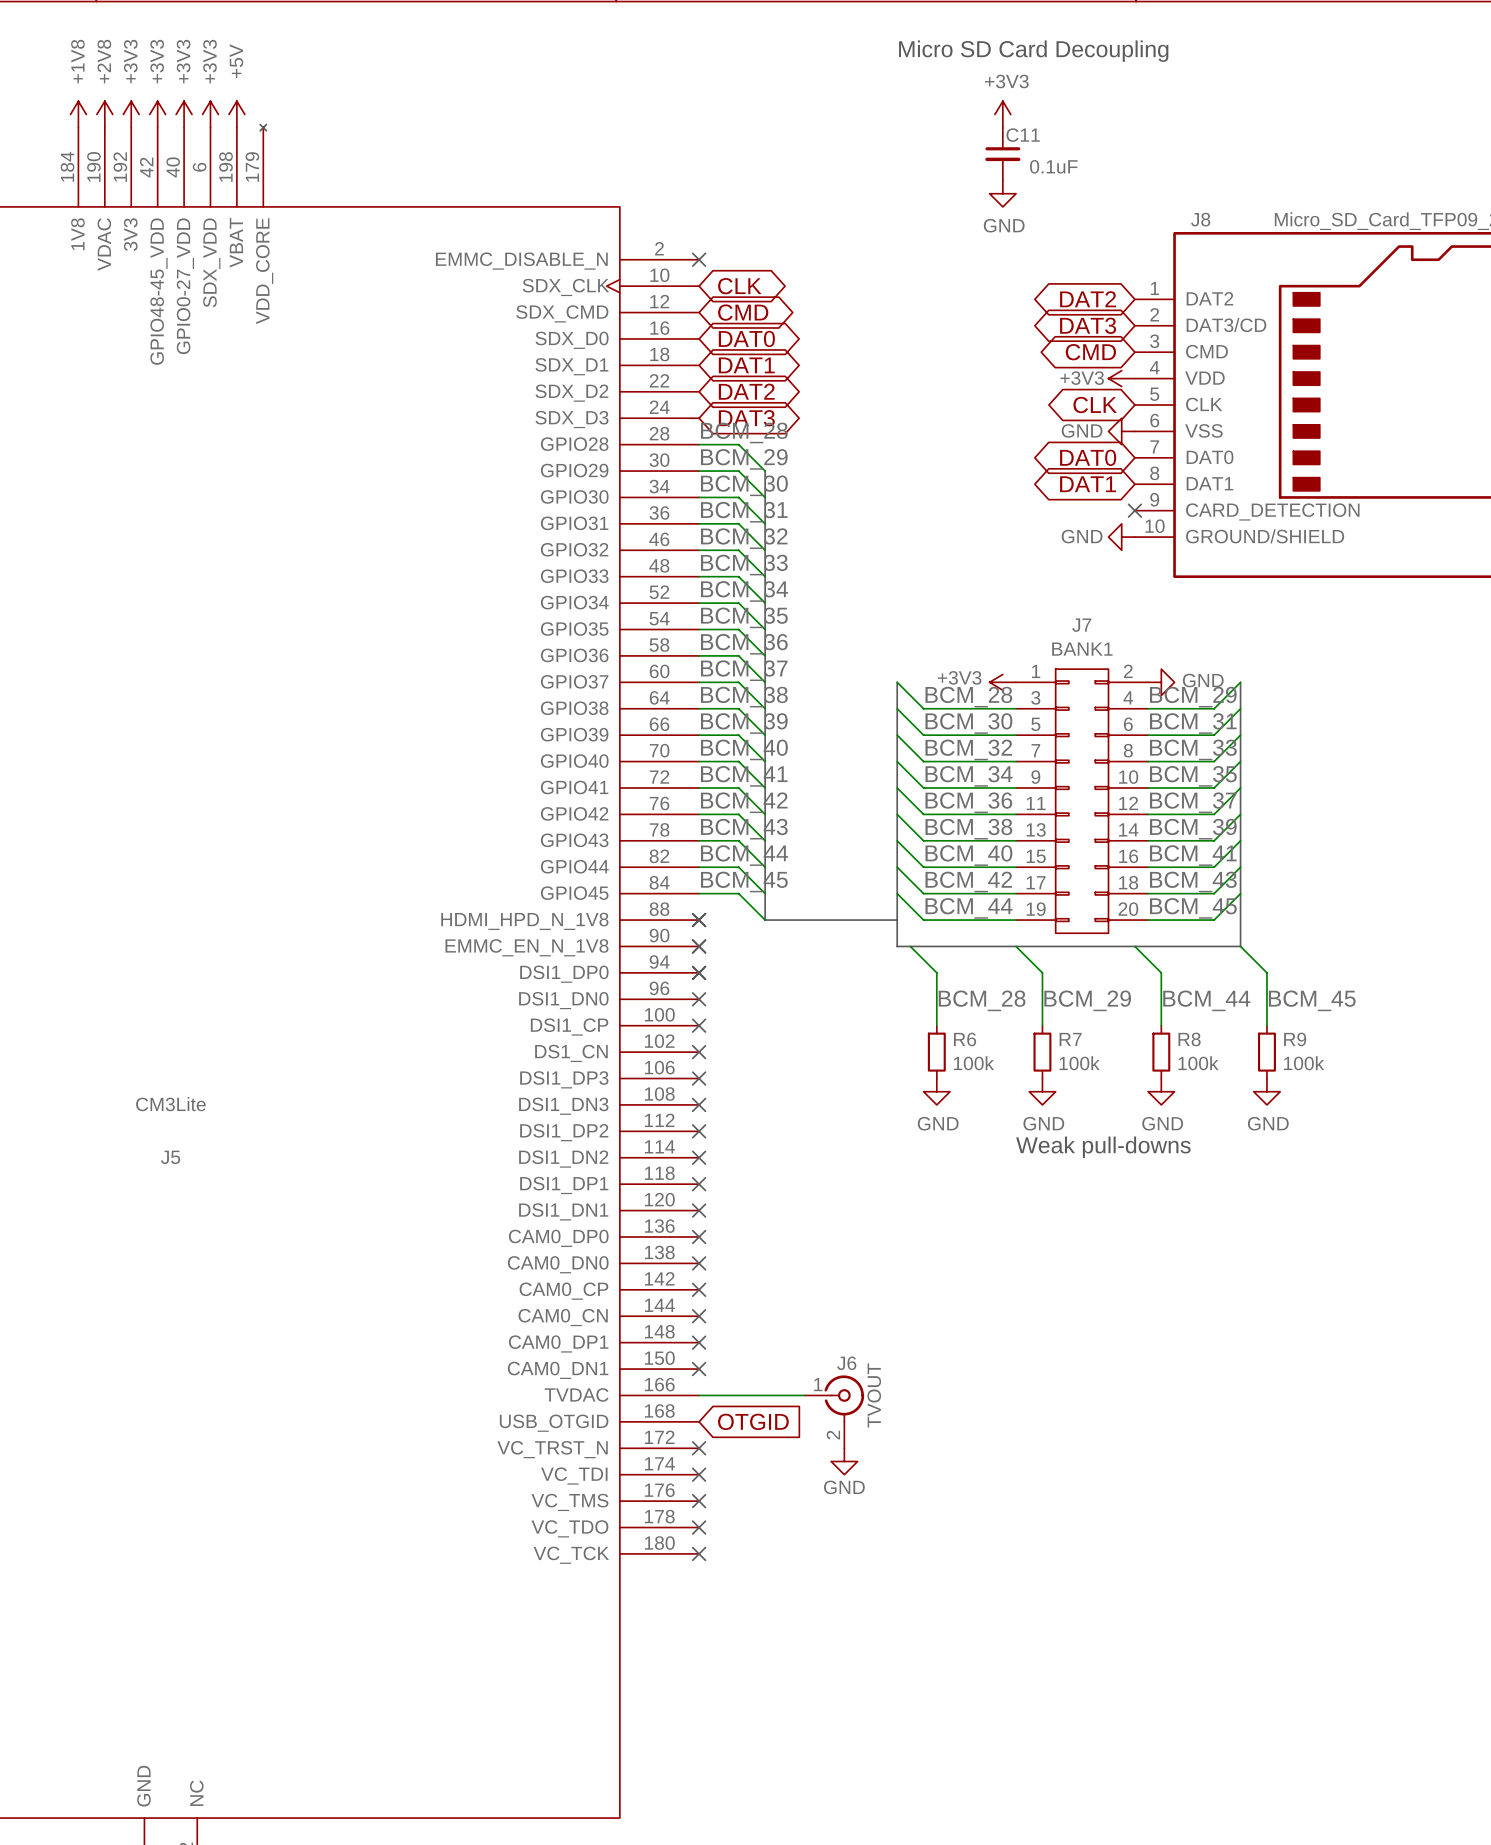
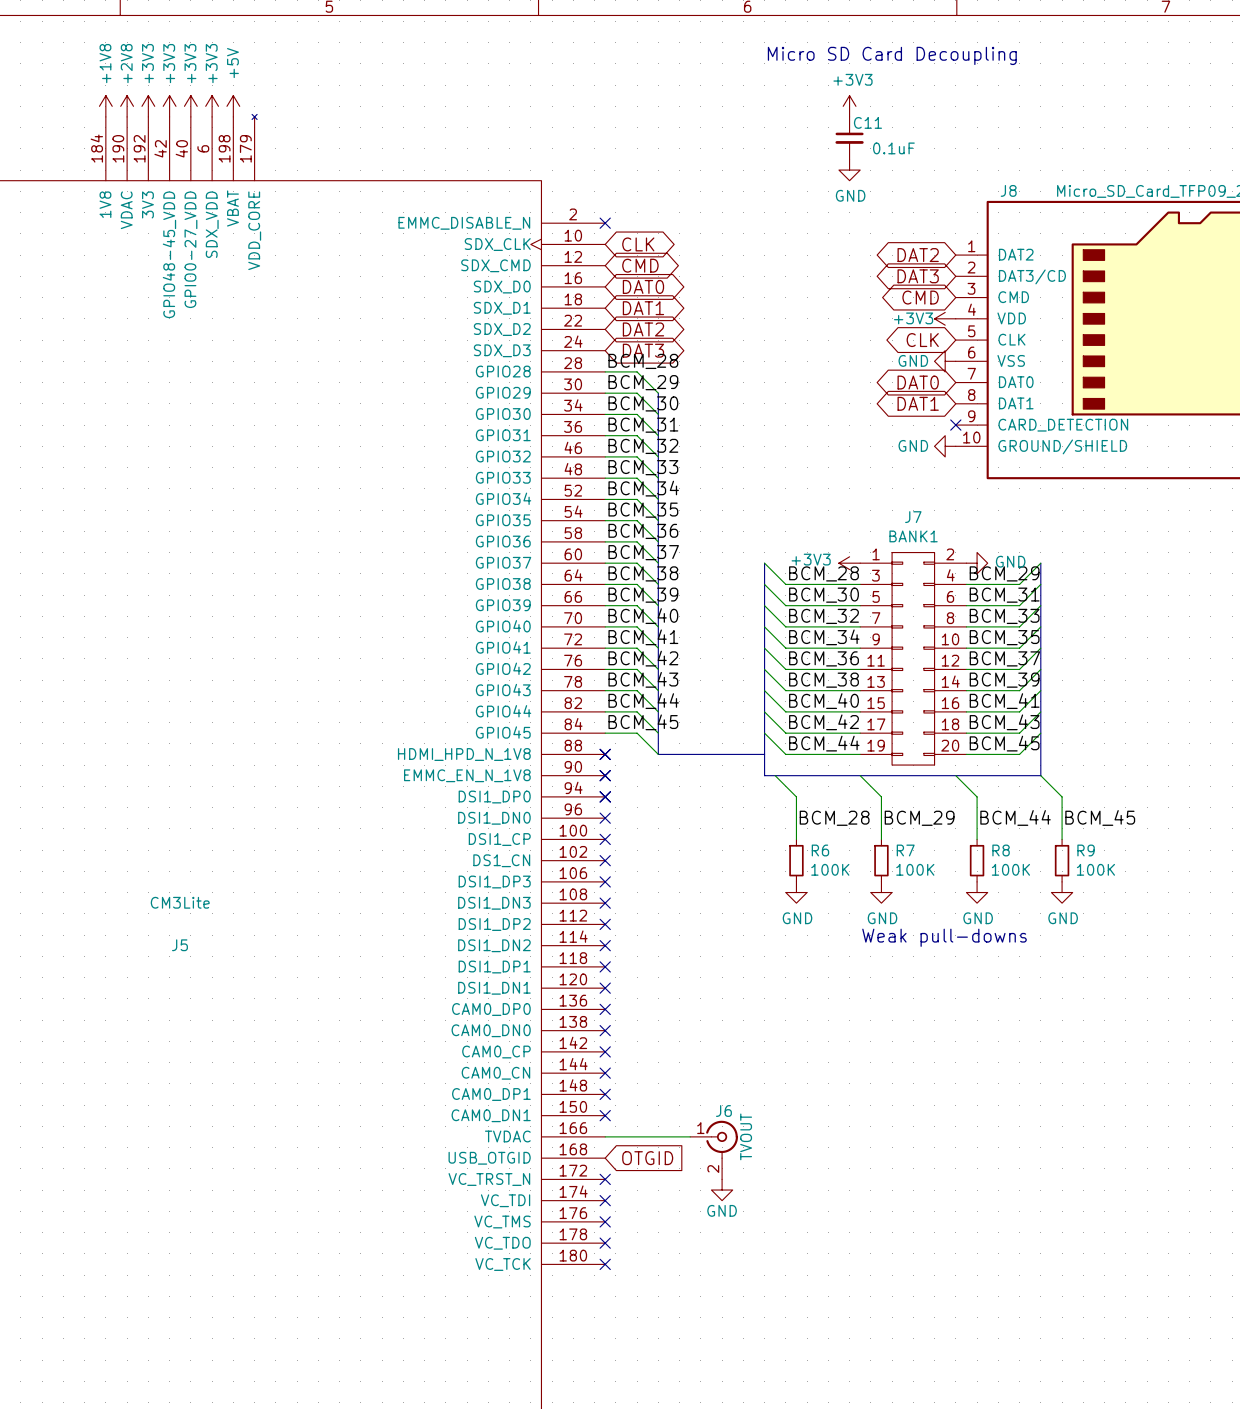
R6 value: 100k (973, 1063) -> 100K (830, 869)
R7 value: 100k (1079, 1063) -> 100K (915, 869)
R8 value: 100k (1198, 1063) -> 100K (1010, 869)
R9 value: 100k (1304, 1063) -> 100K (1095, 869)

